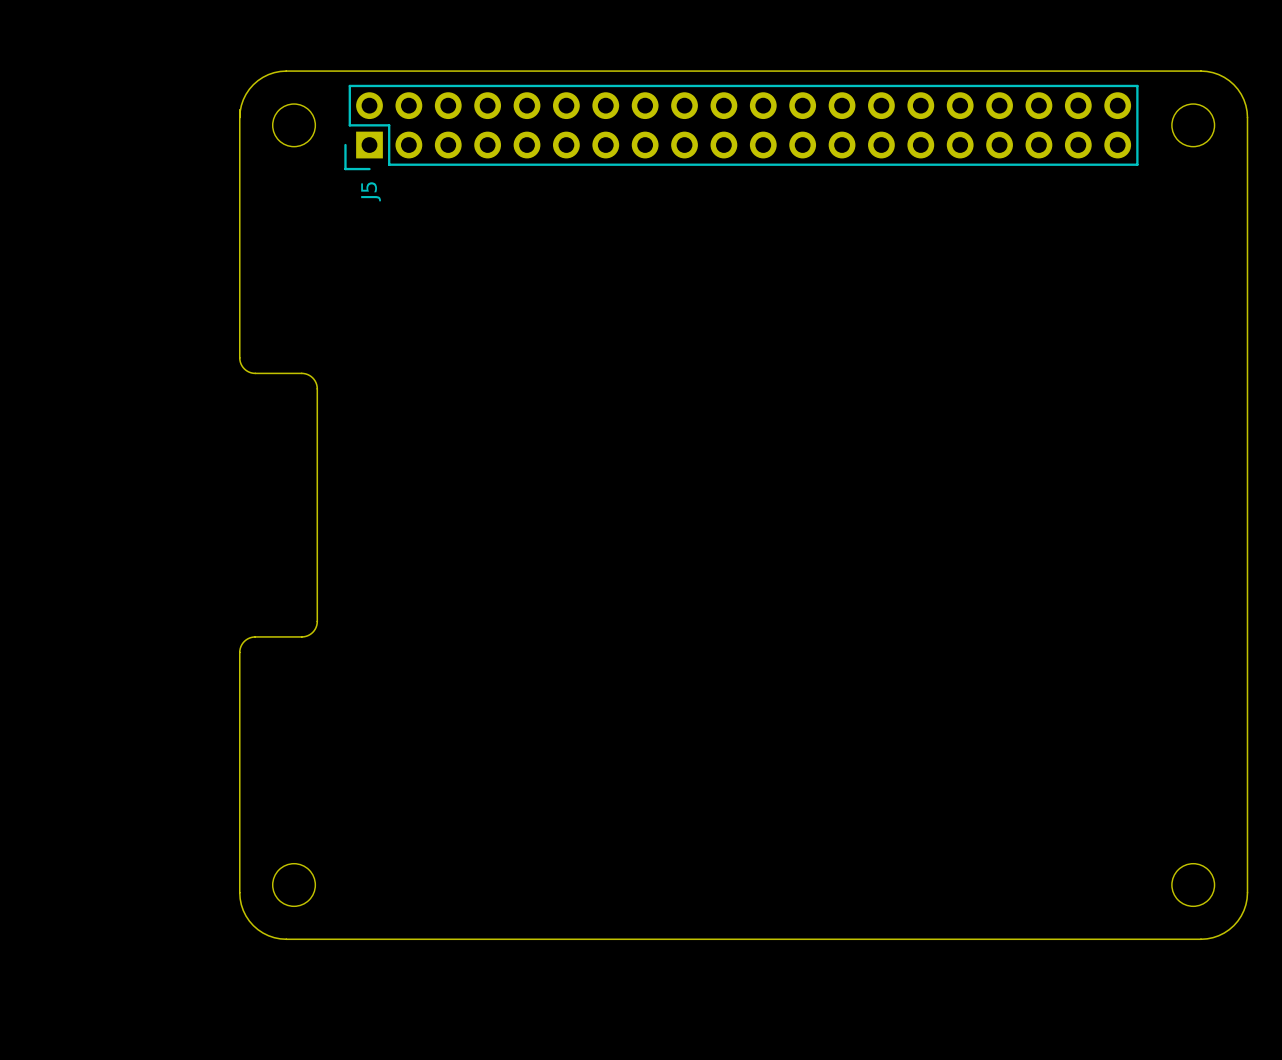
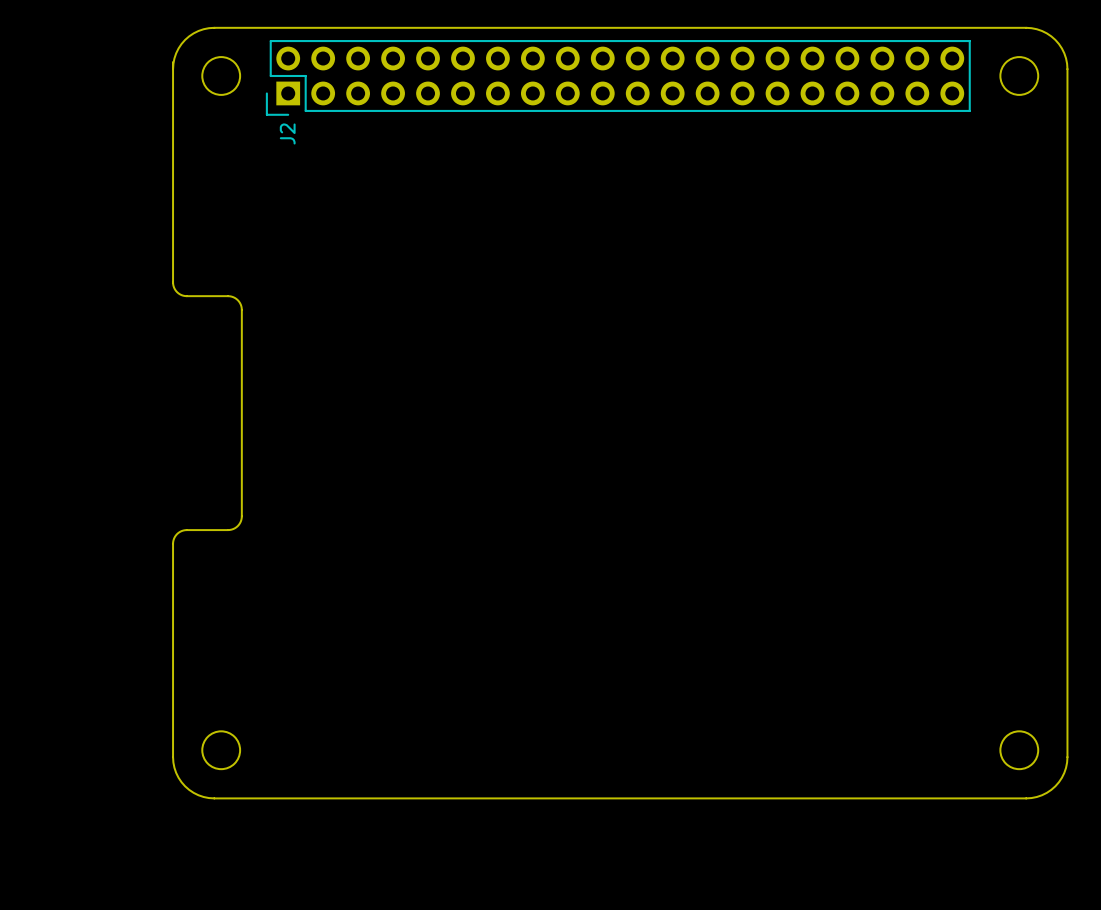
J5 name: J5 (371, 191) -> J2 (287, 133)

